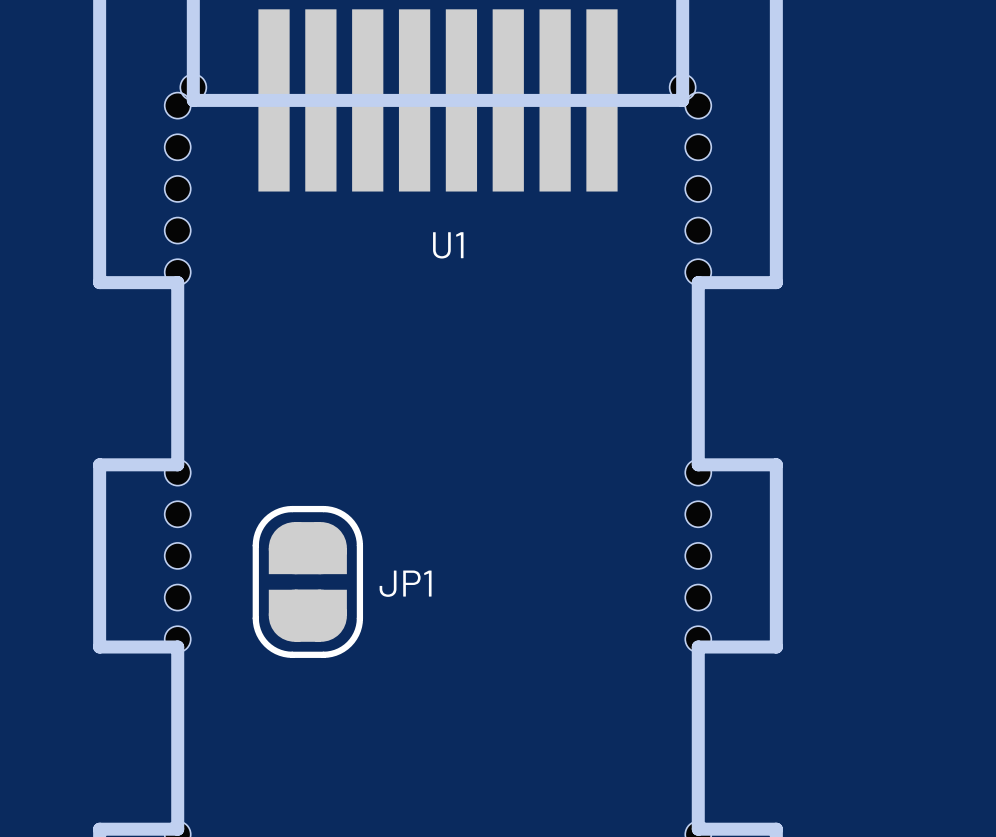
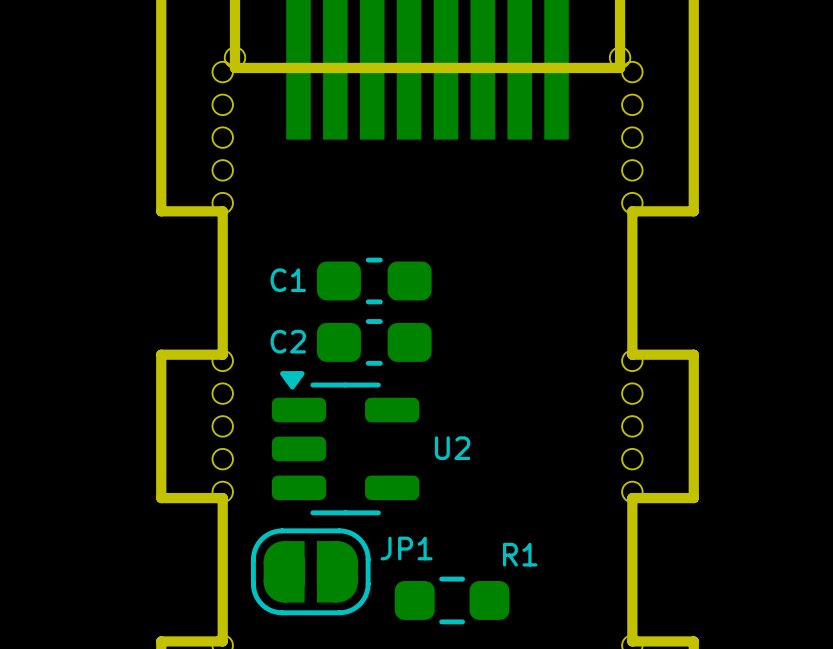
U1 name: U1 (448, 245) -> none
C1: none -> (374, 280)
C2: none -> (374, 342)
U2: none -> (345, 443)
JP1 rotation: 0° (307, 581) -> 90° clockwise (310, 571)
JP1 position: (307, 581) -> (310, 571)
R1: none -> (452, 600)

